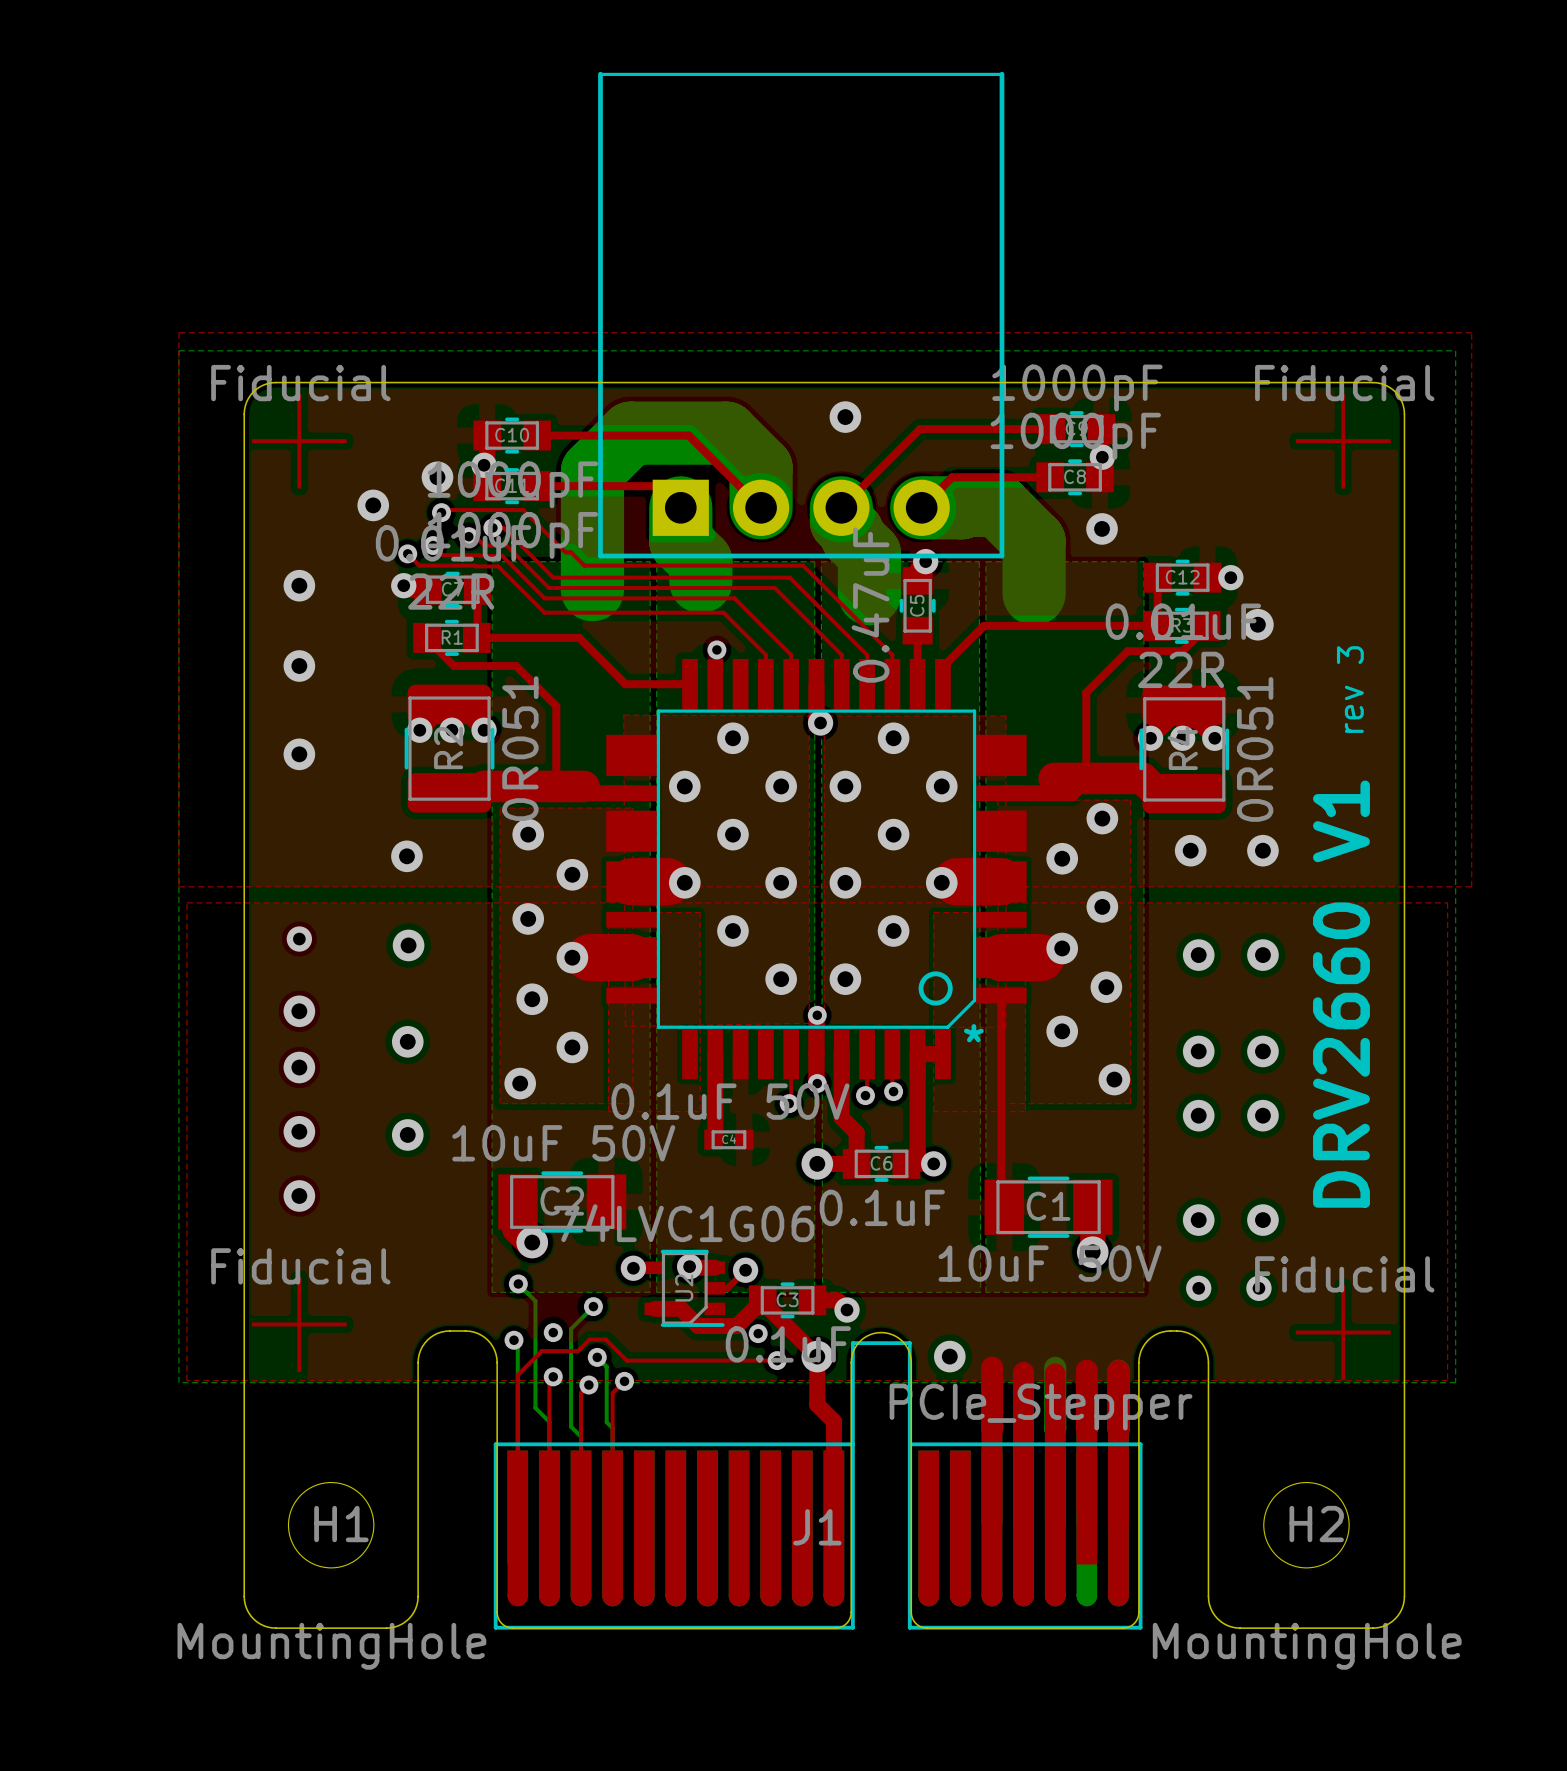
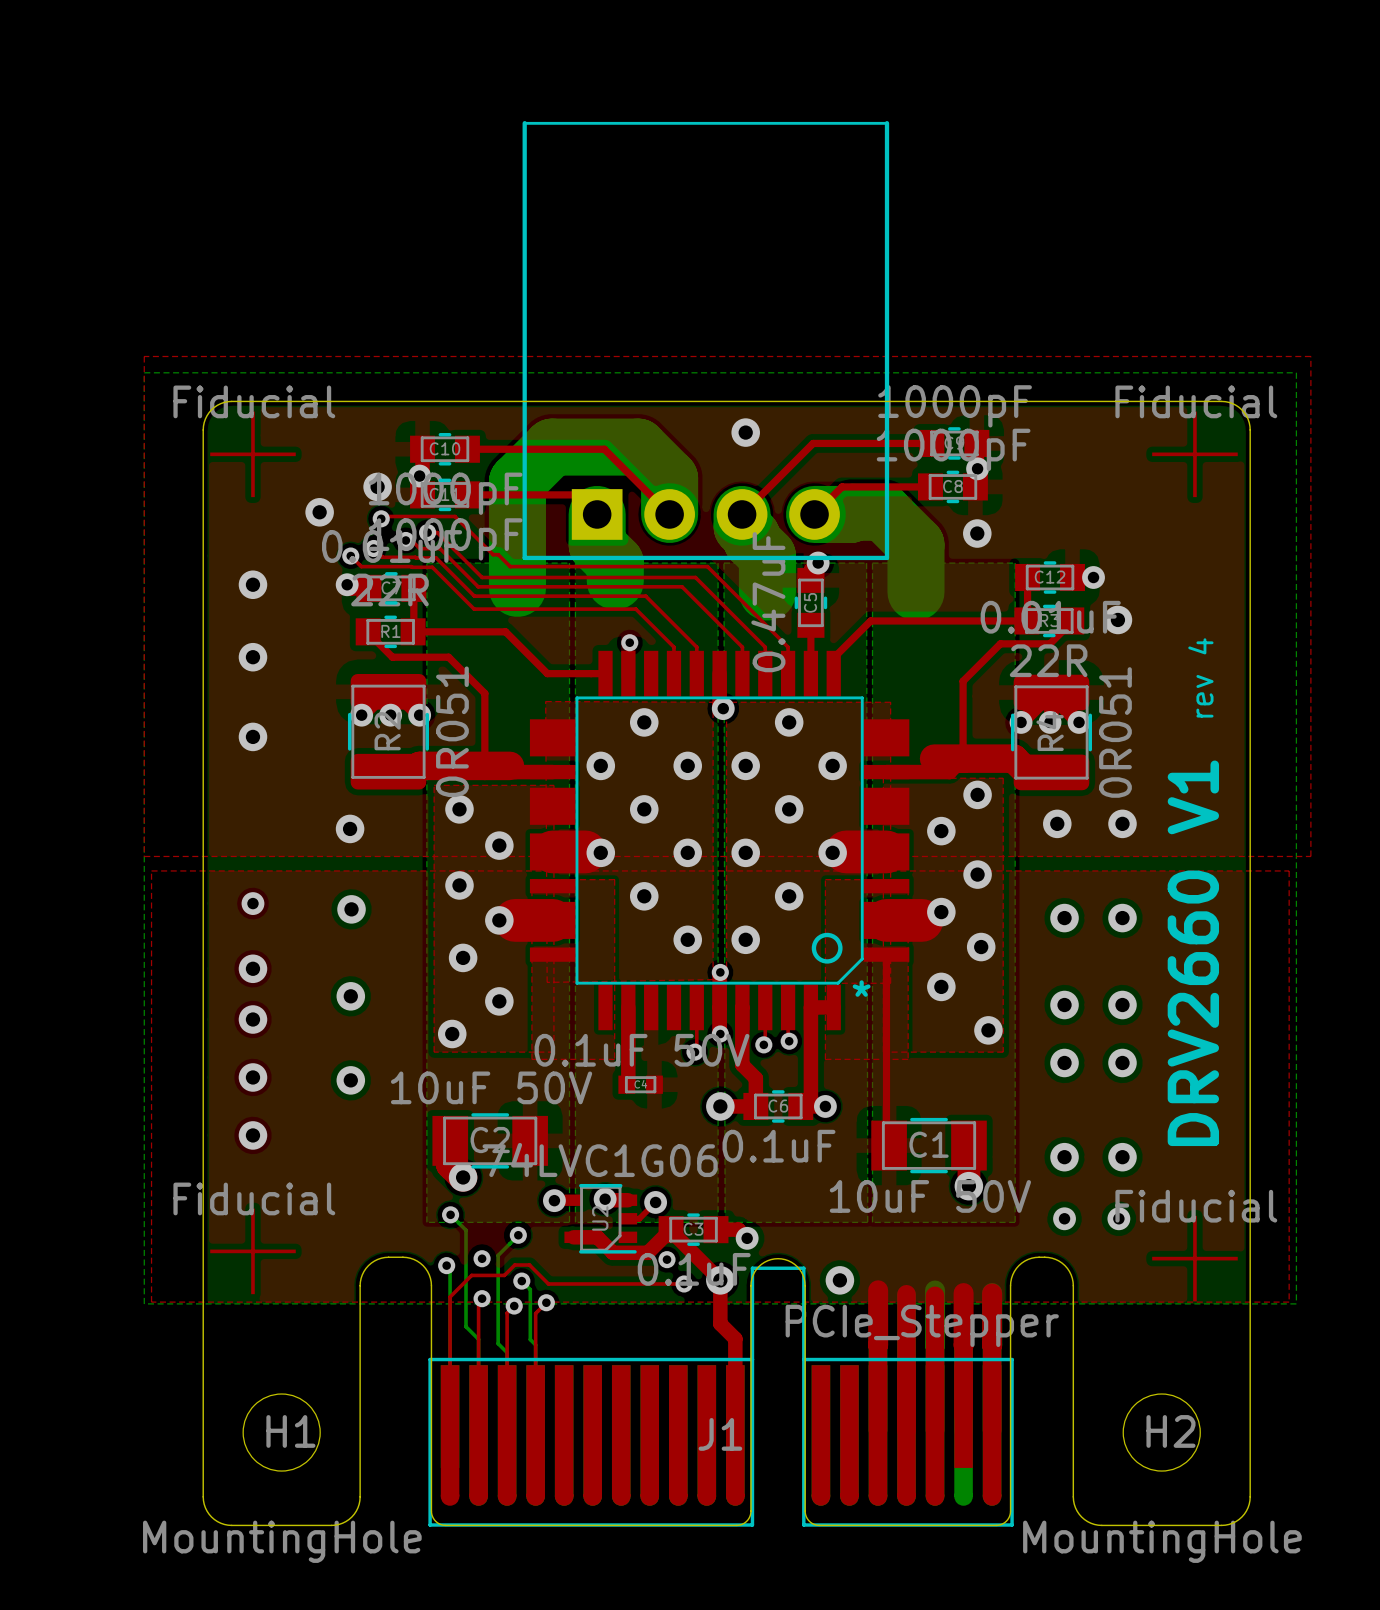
text: rev 3 (1350, 689) -> rev 4 (1200, 677)

